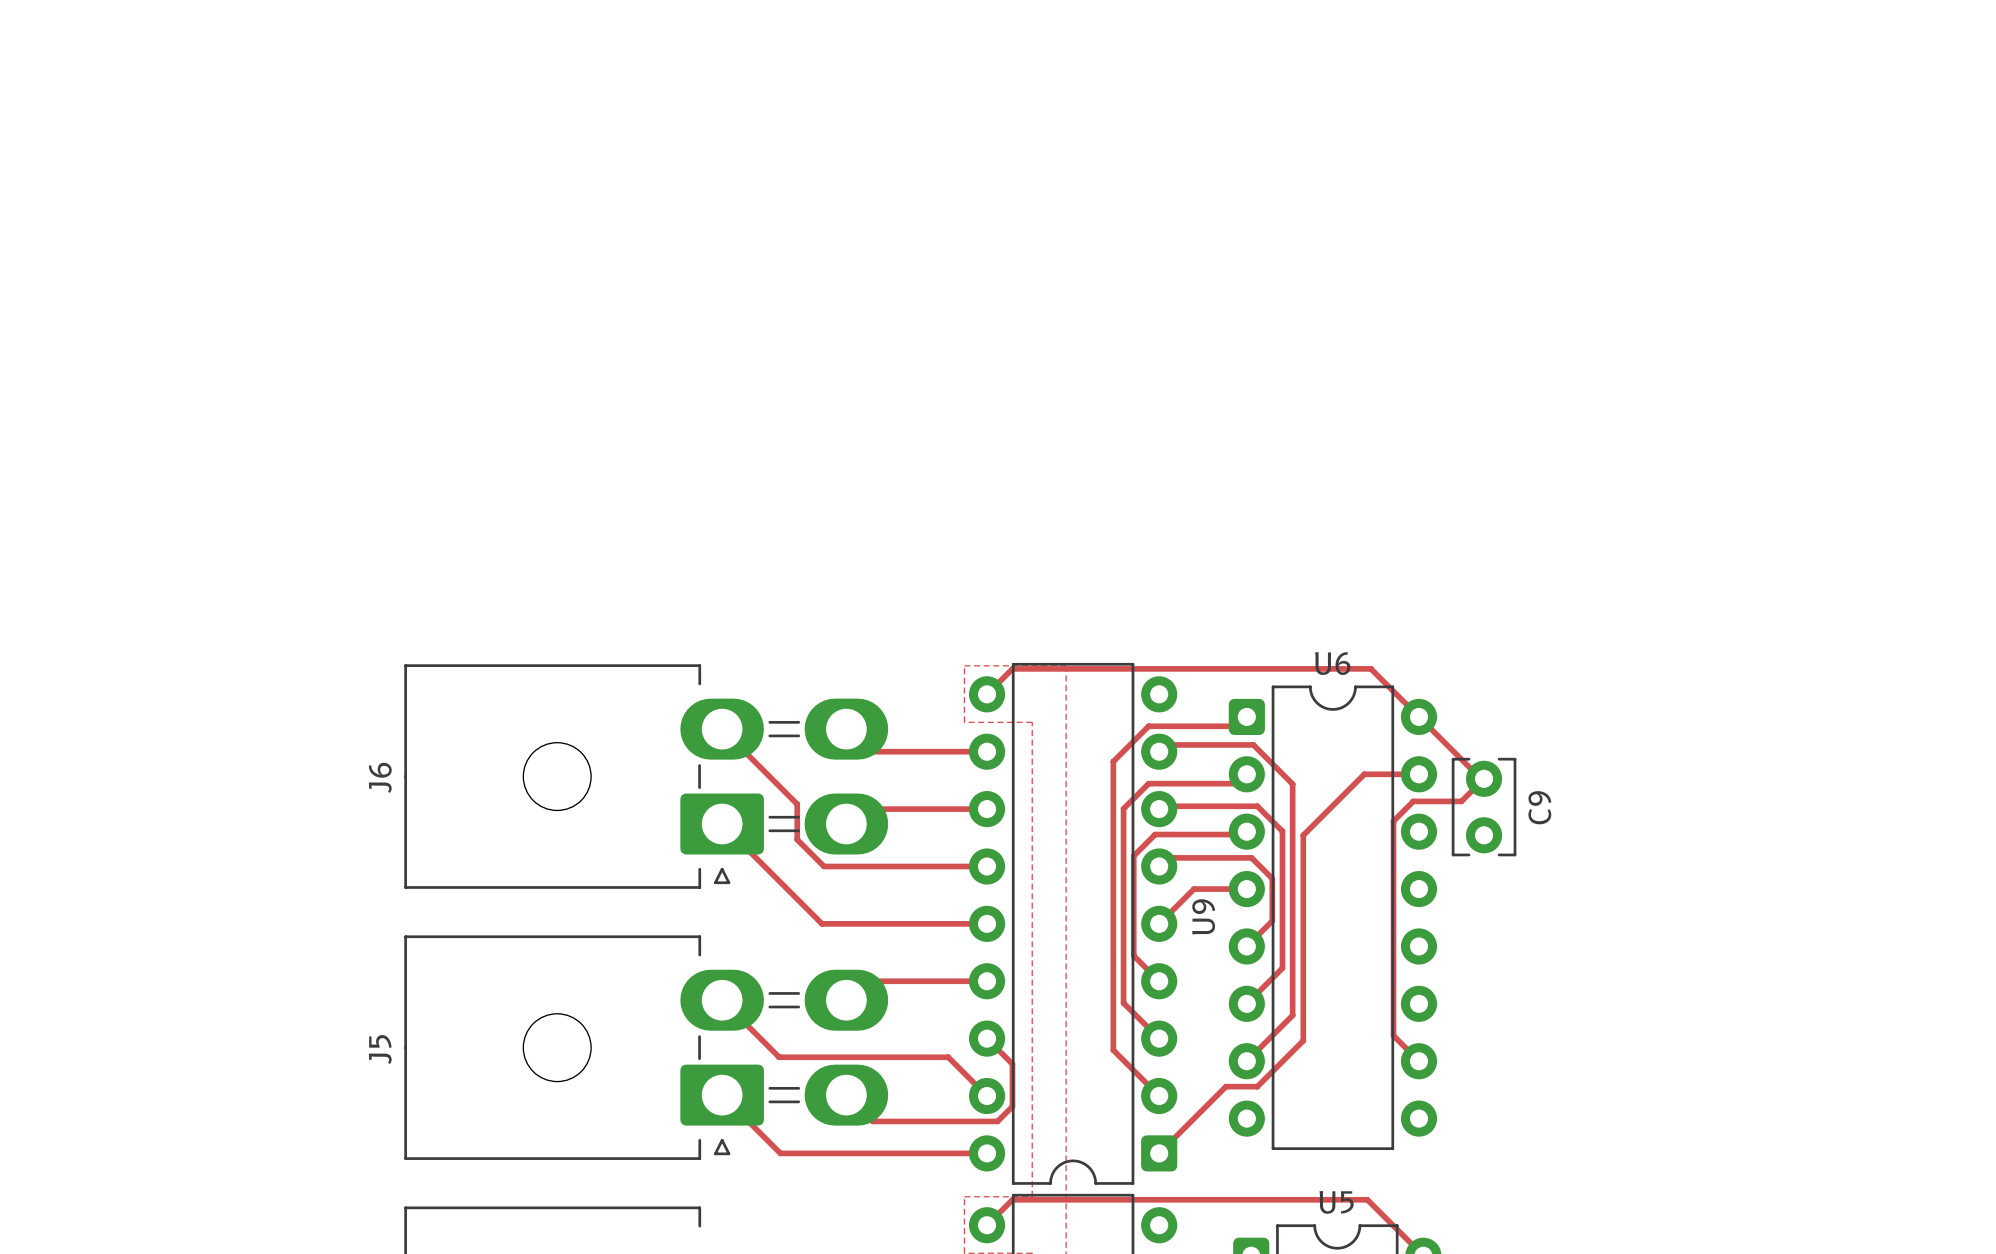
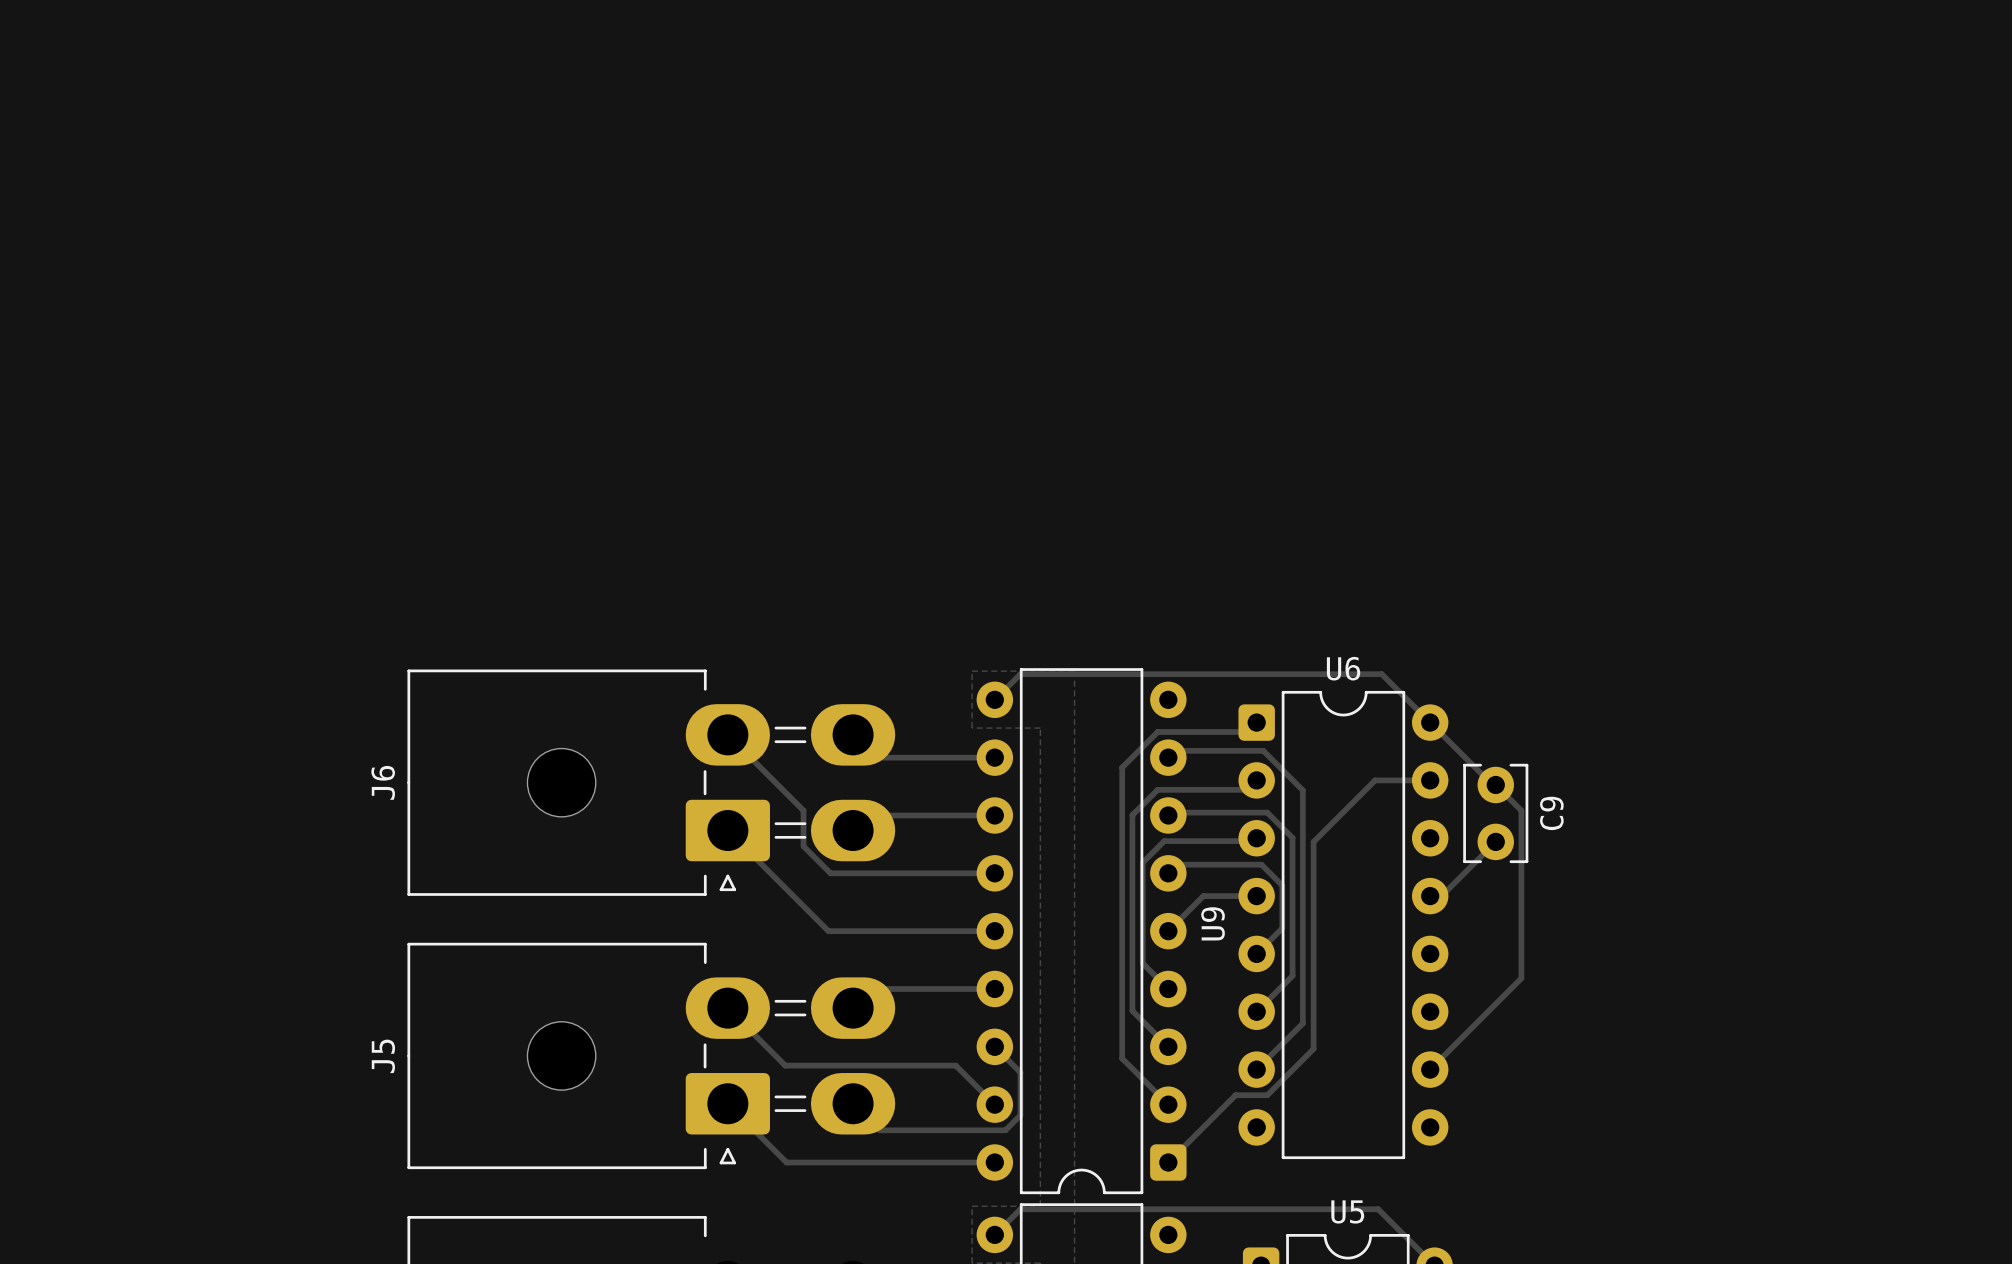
track: (1484, 778) (1461, 801) (1413, 801) (1393, 821) (1393, 1035) (1418, 1061) -> (1495, 784) (1521, 810) (1521, 978) (1430, 1069)
track: none -> (1495, 841) (1441, 896)

